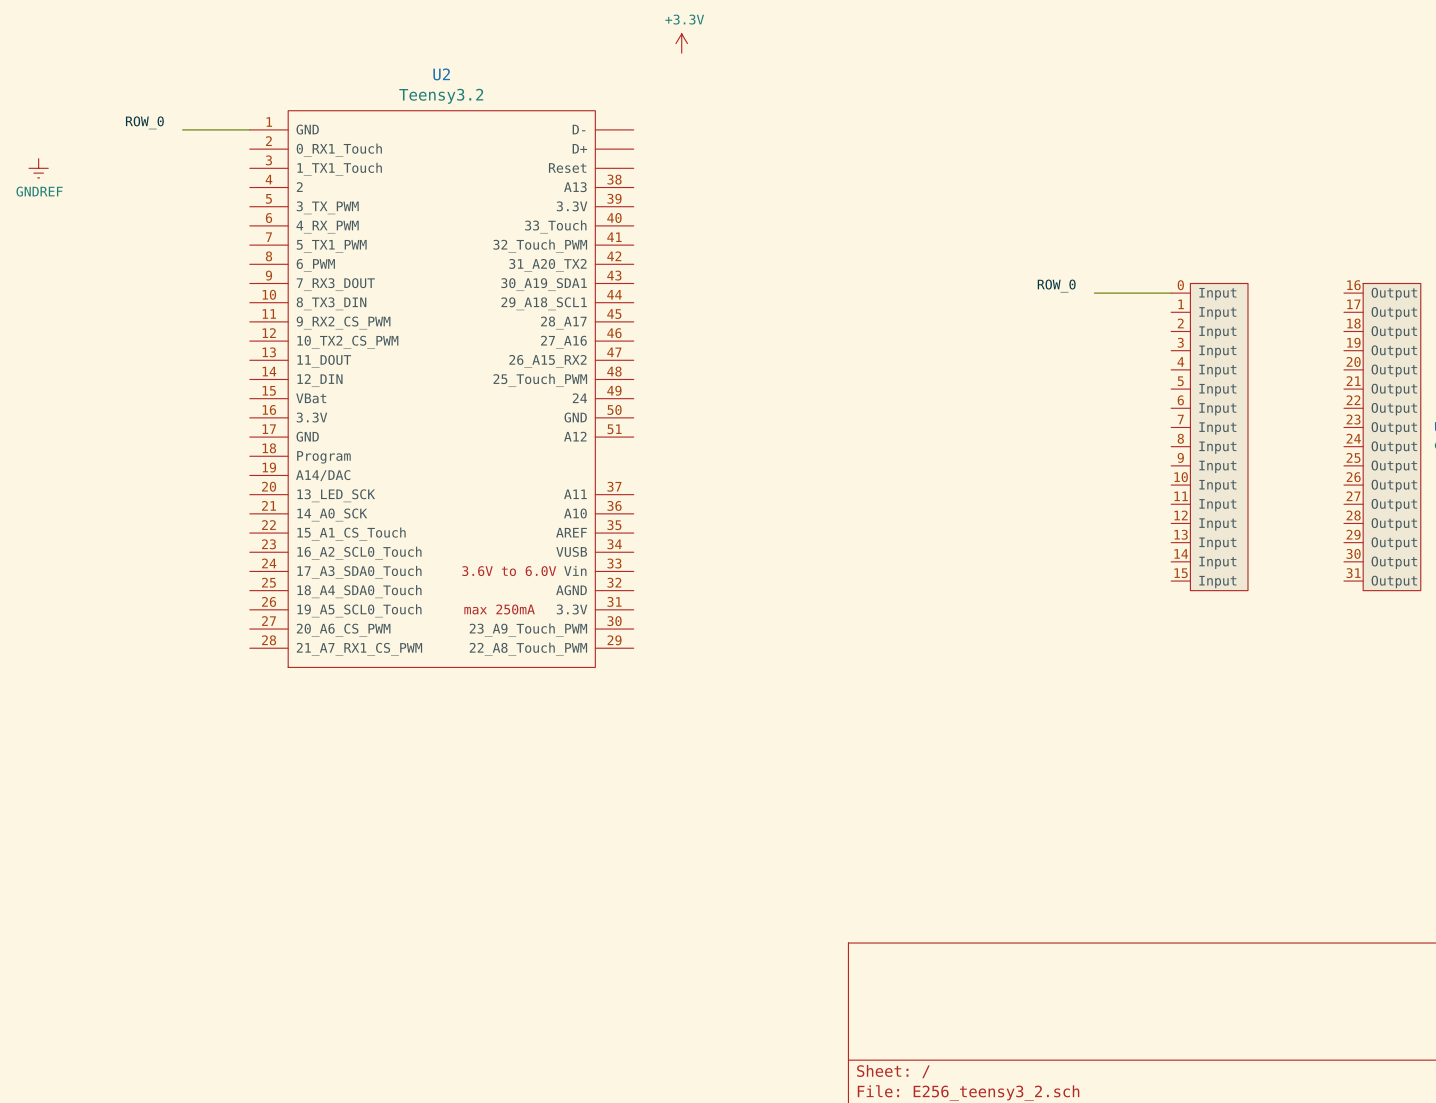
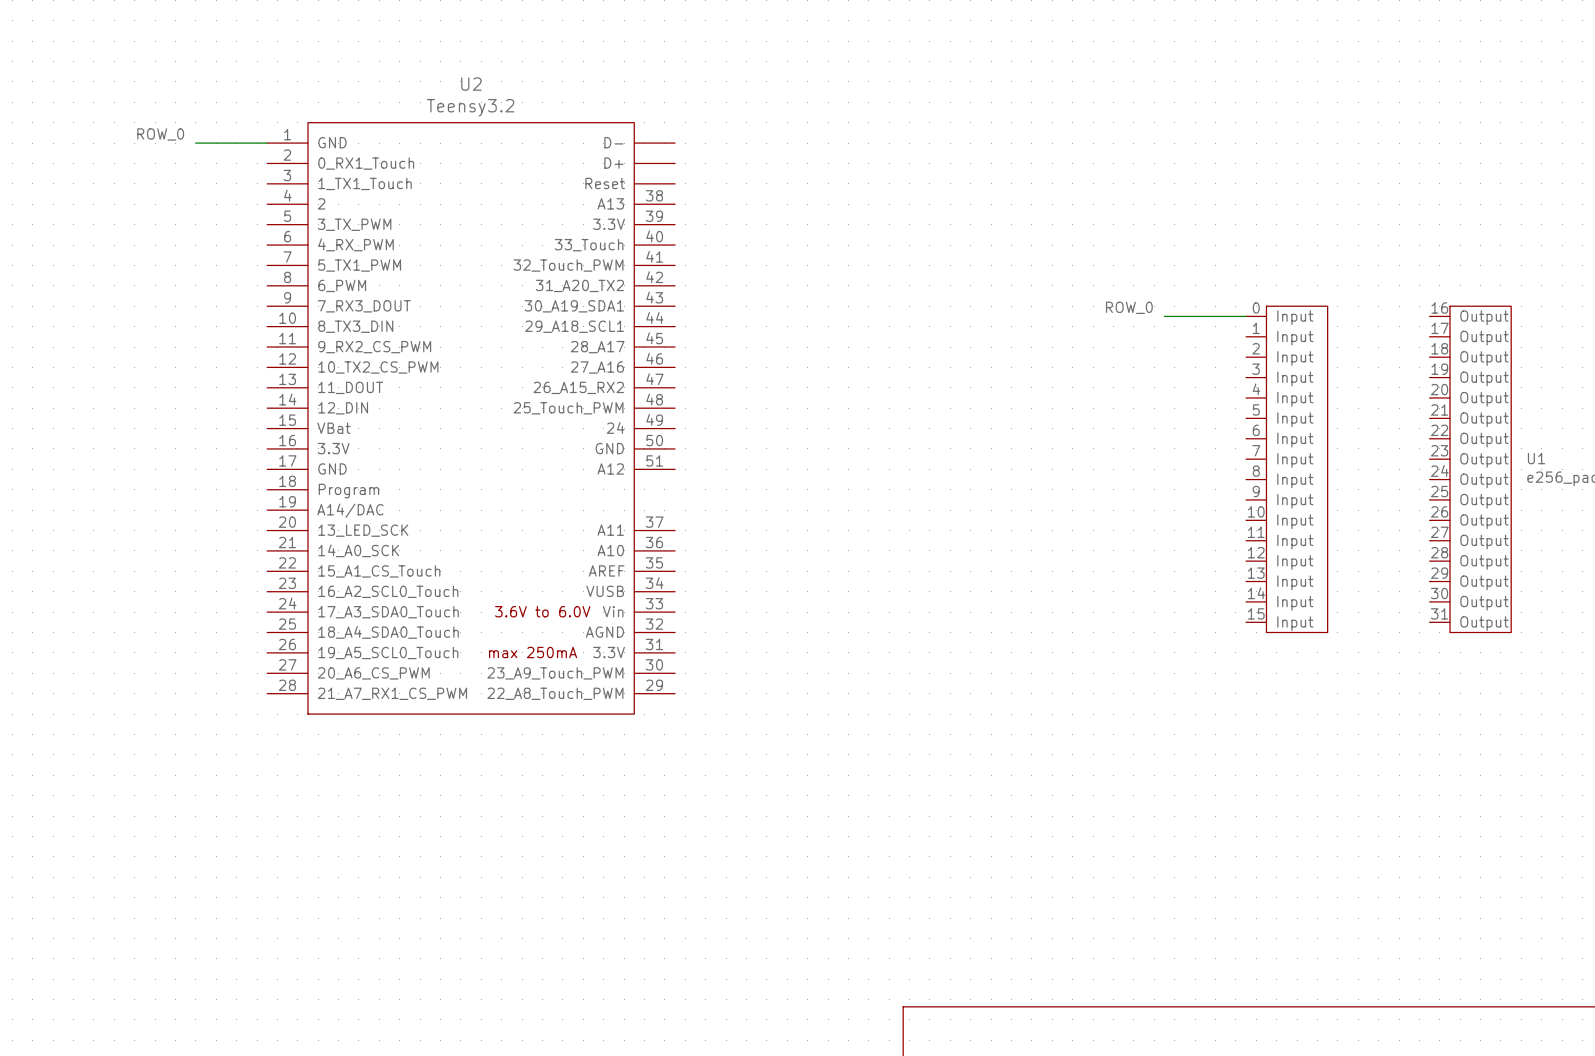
power symbol: +3.3V (681, 43) -> none
power symbol: GNDREF (38, 168) -> none

